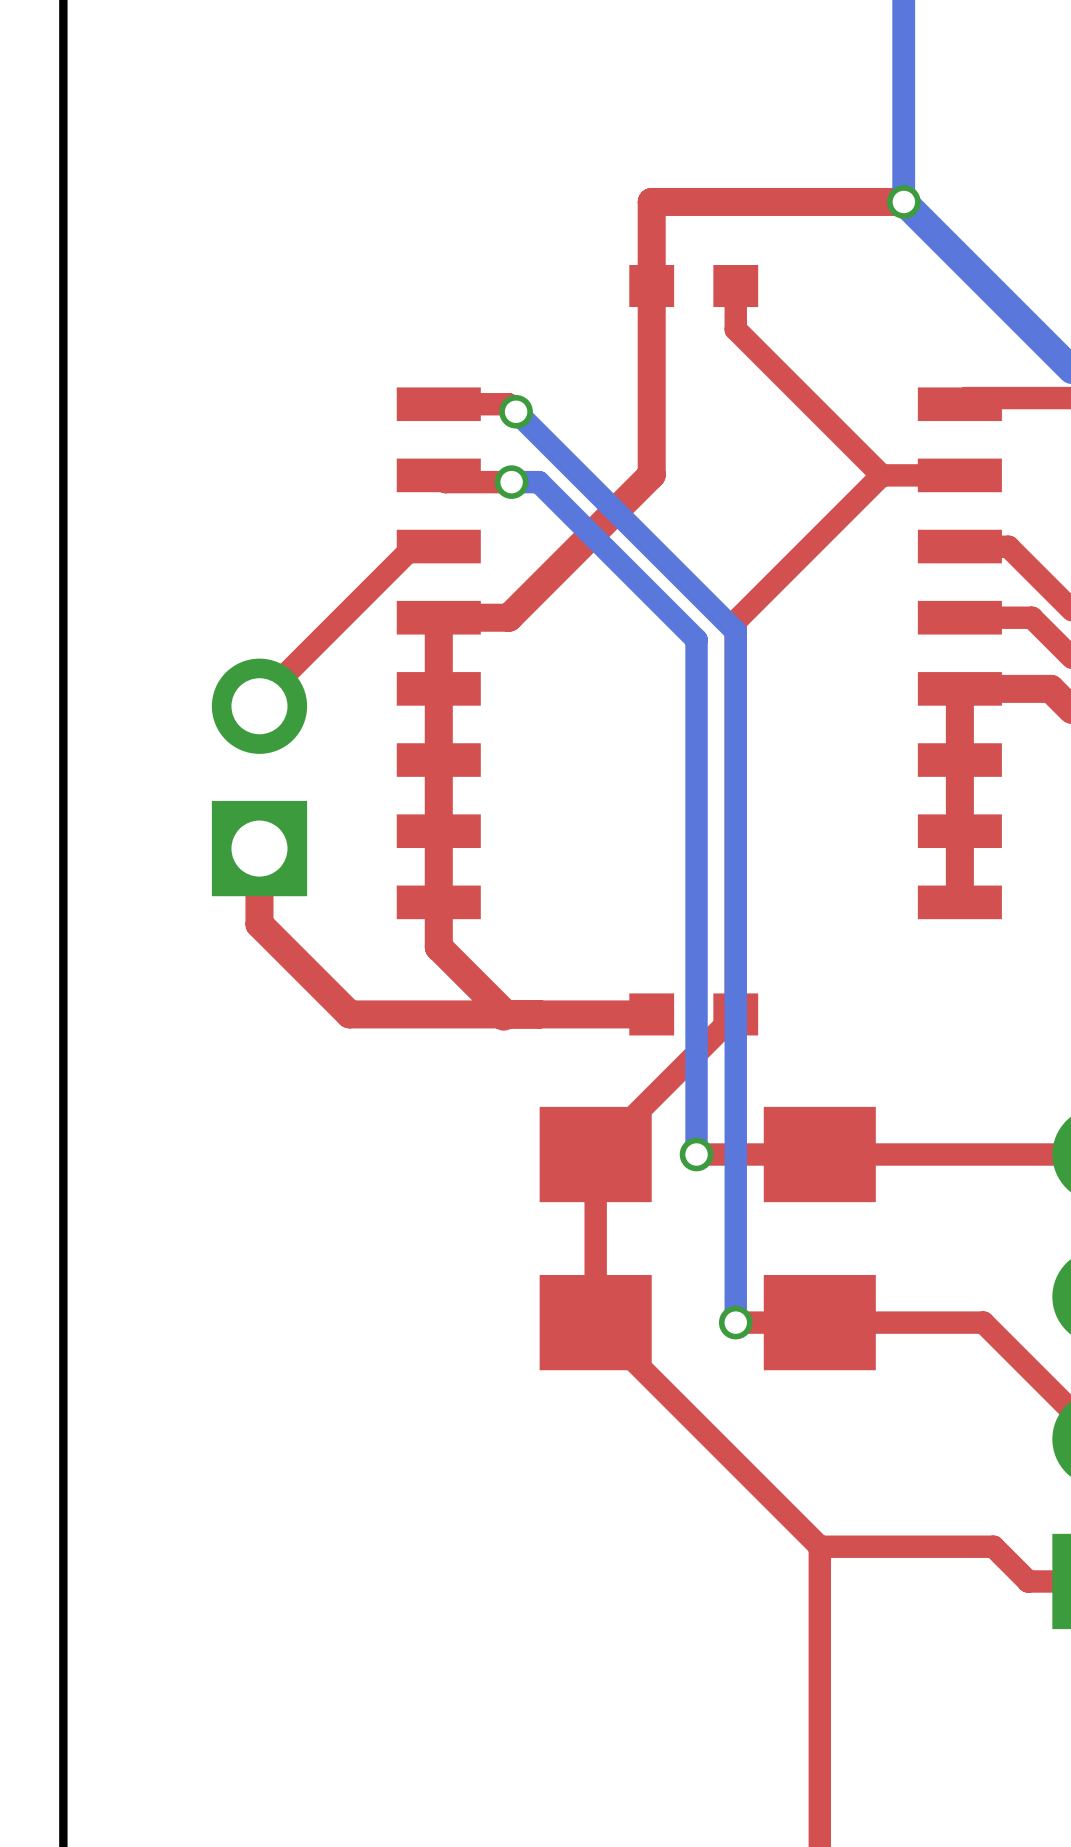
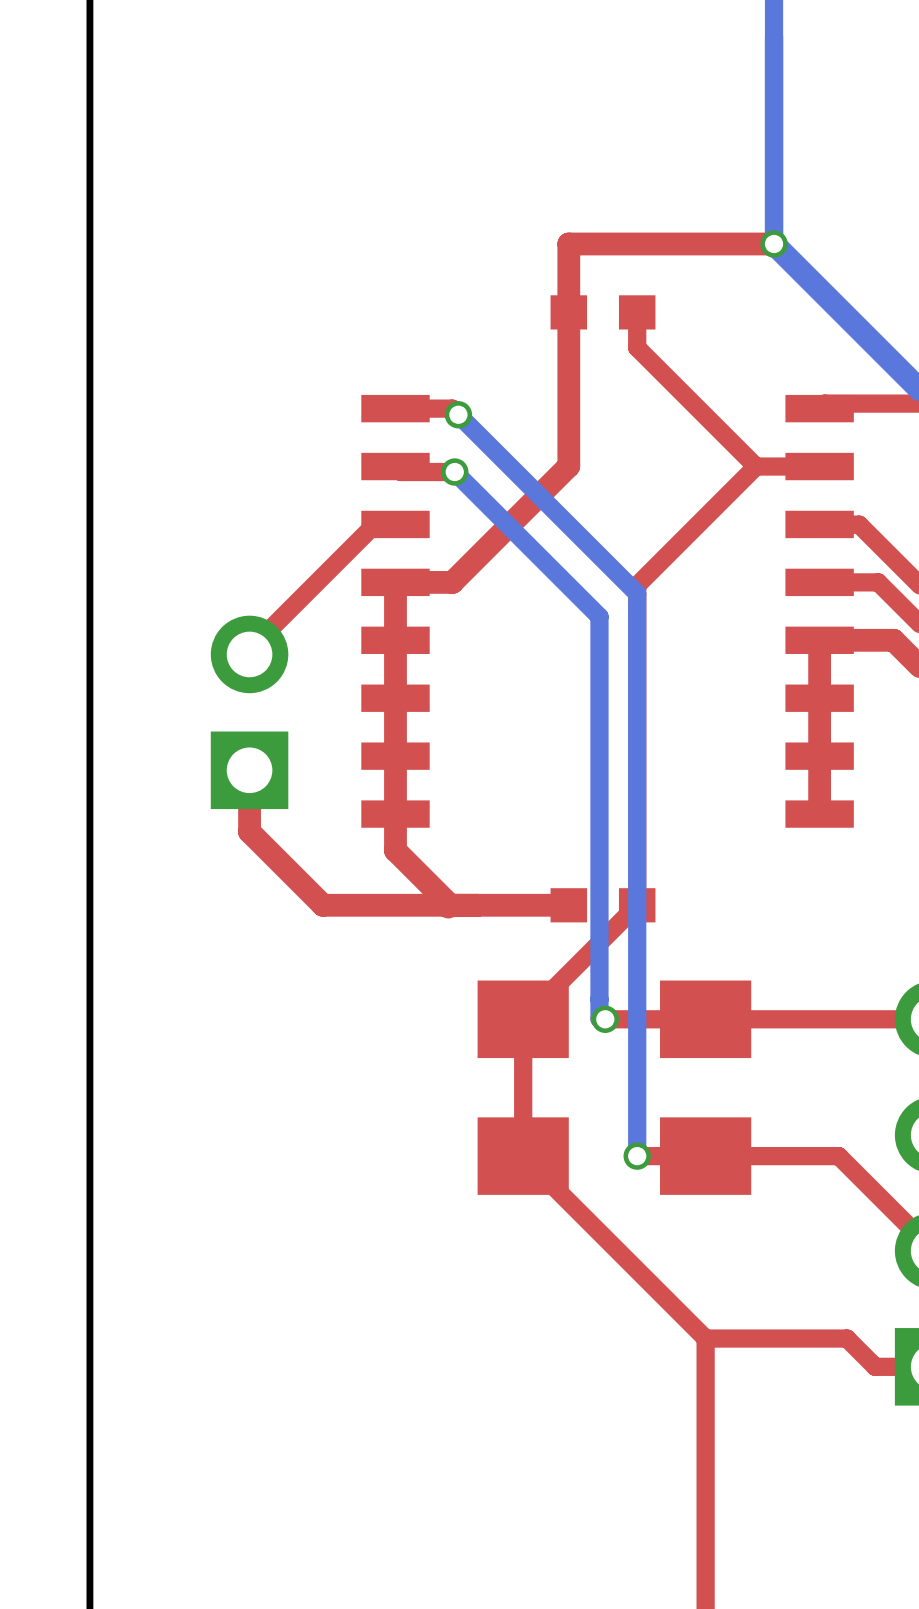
bottom track: (511, 482) (538, 482) (696, 639) (696, 1154) -> (454, 472) (599, 616) (599, 1018)

